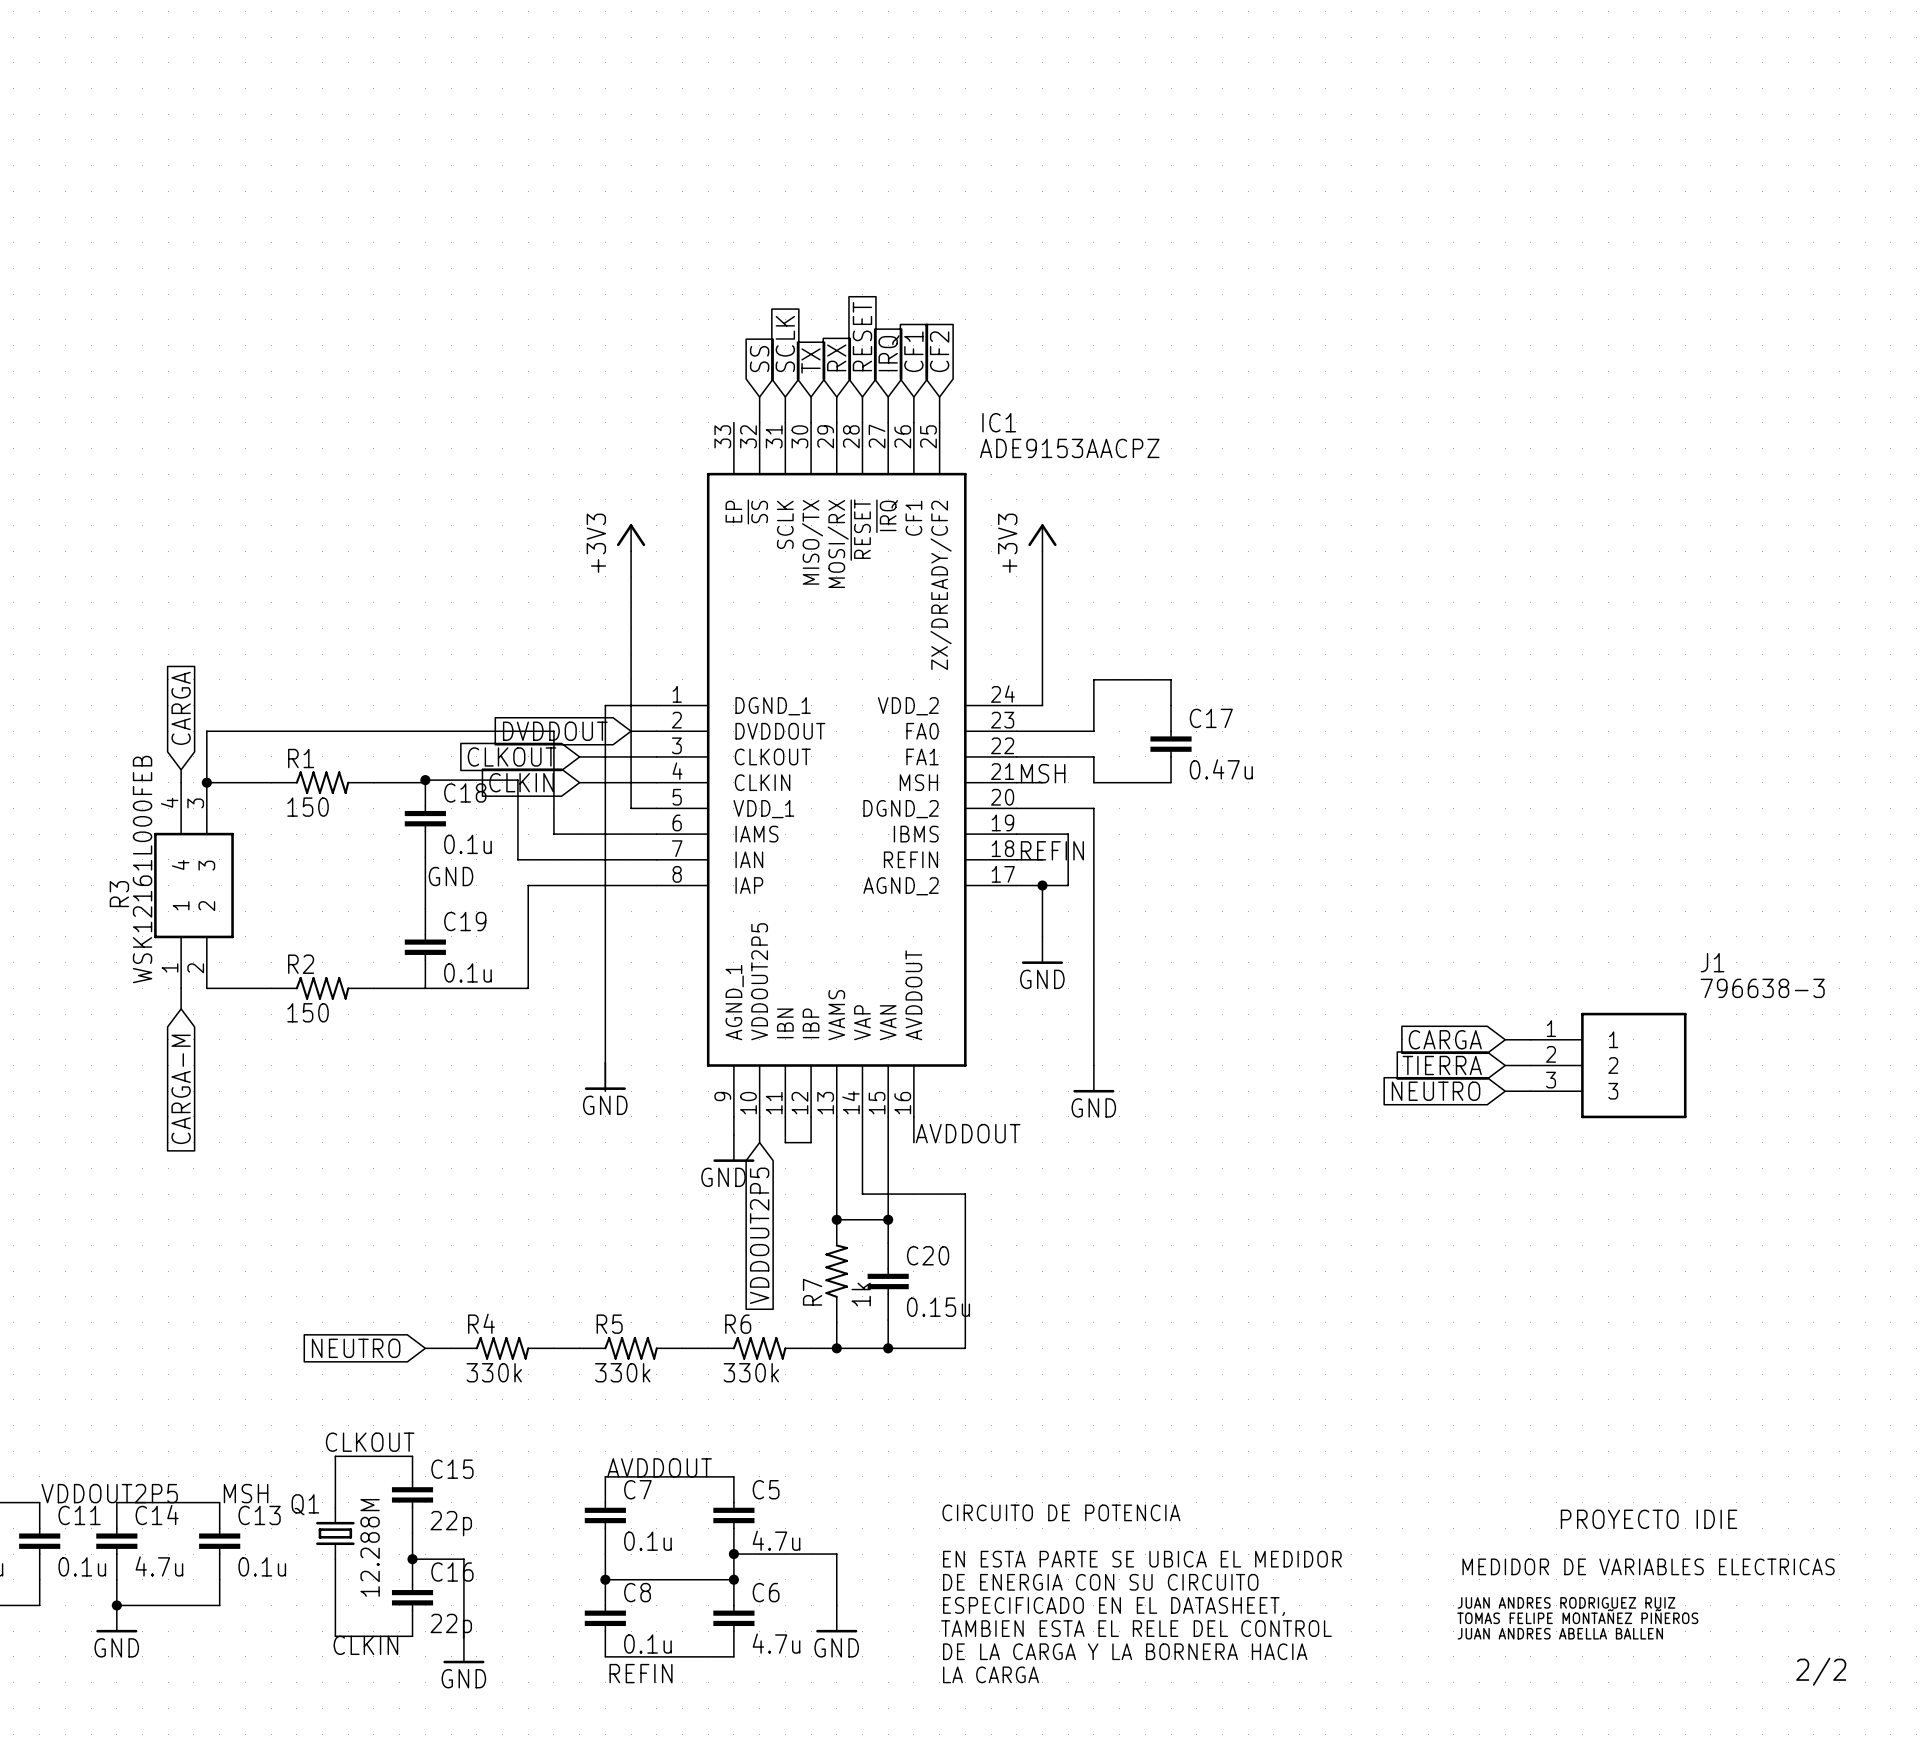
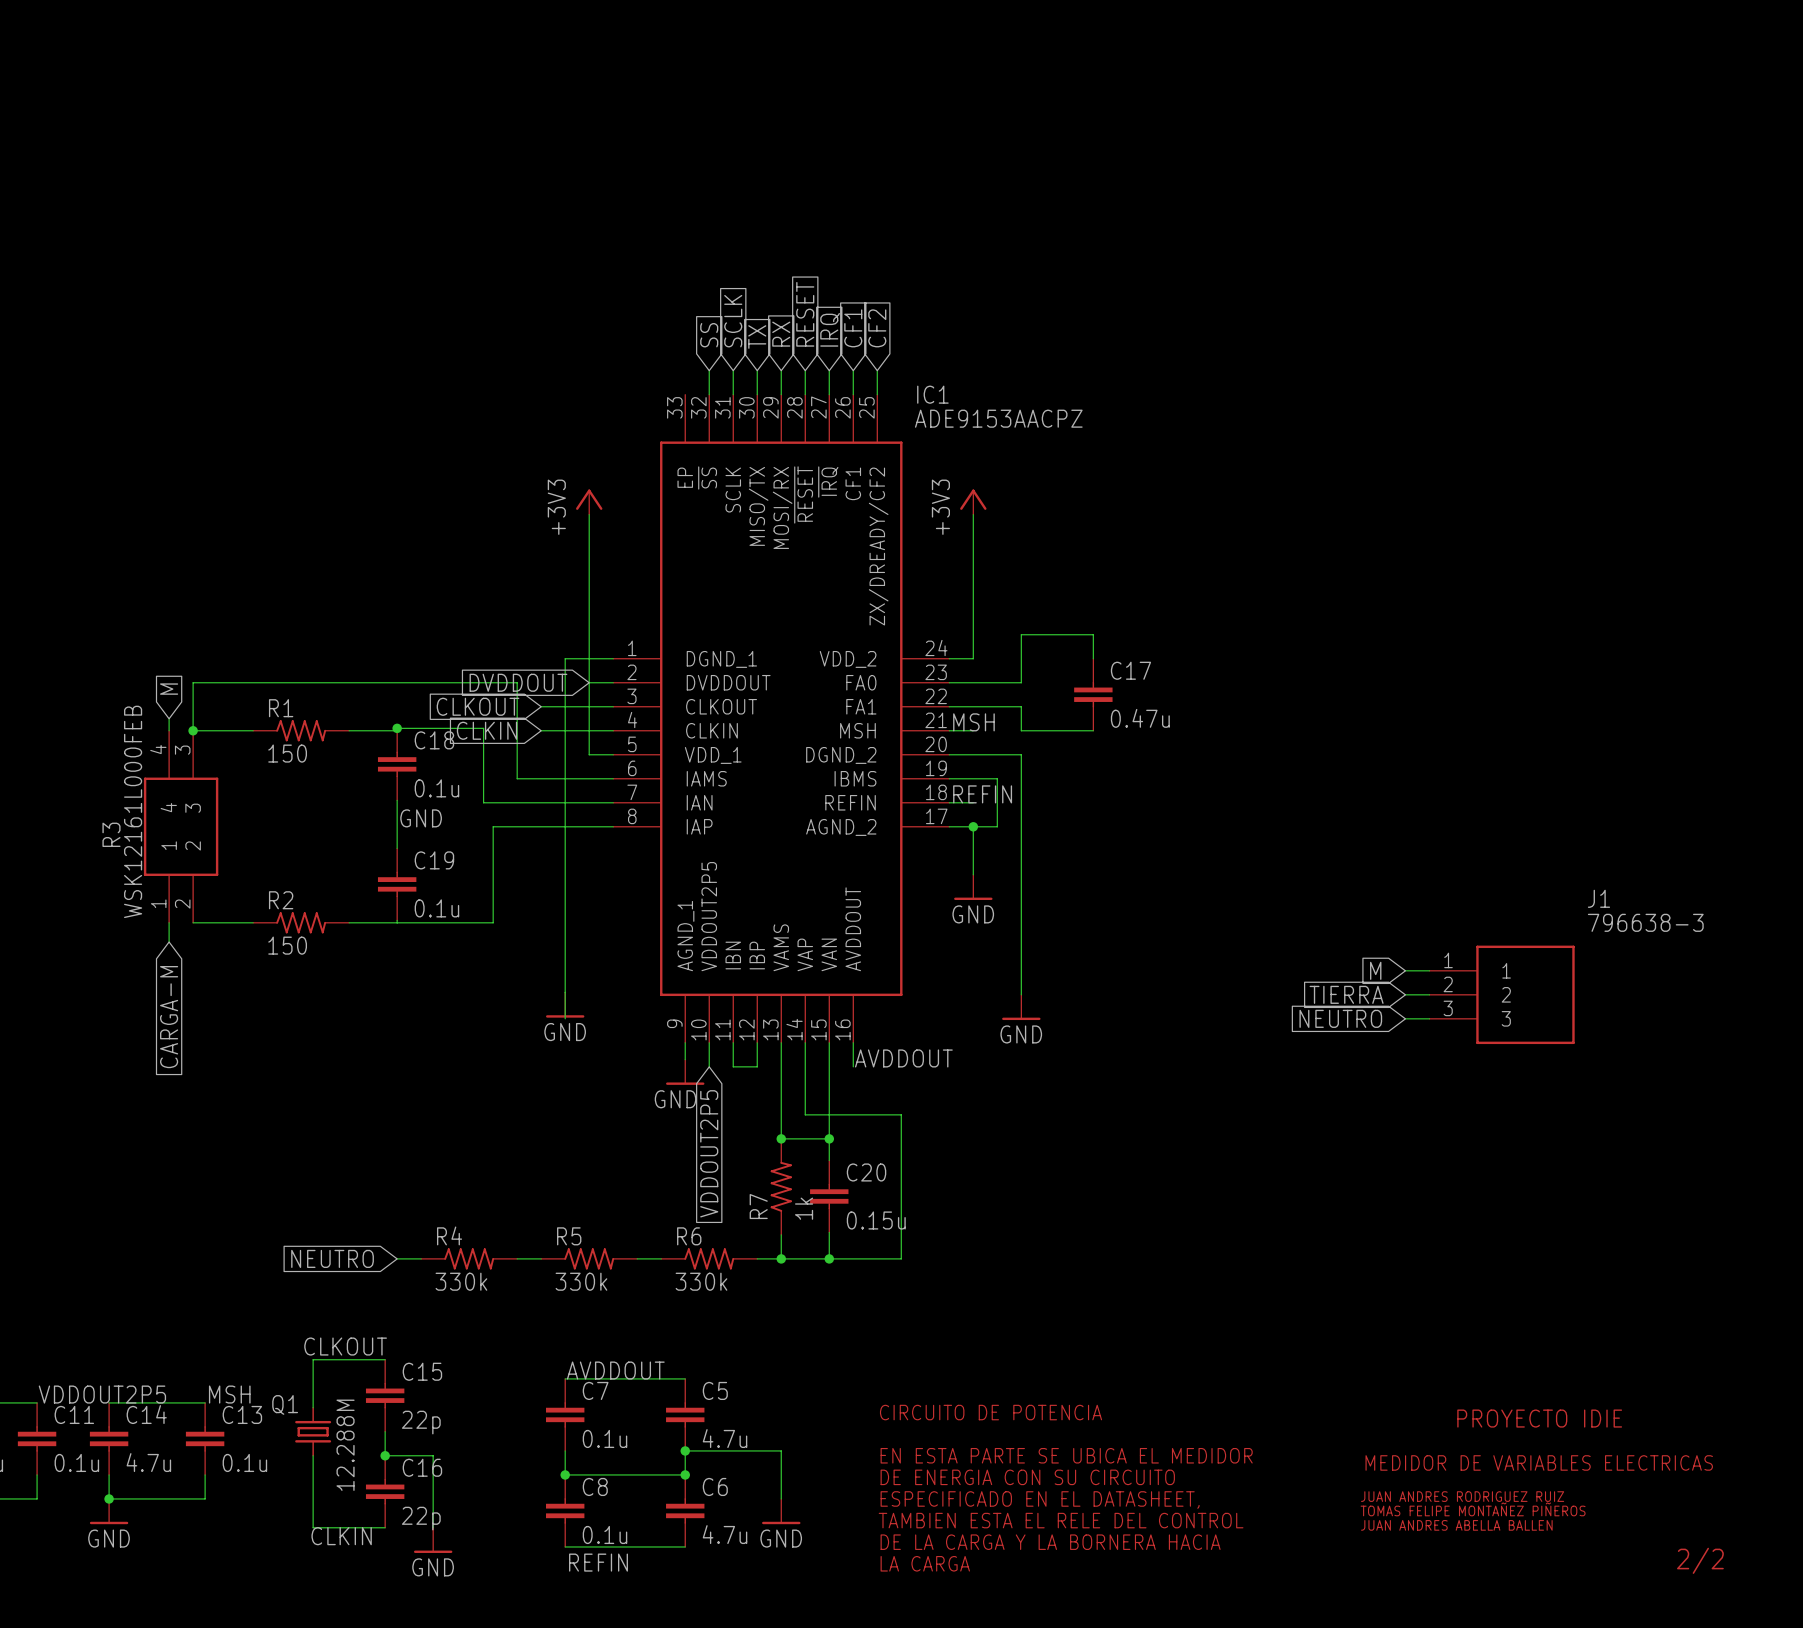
global label: CARGA (181, 708) -> M (169, 689)
global label: CARGA (1445, 1039) -> M (1375, 970)

